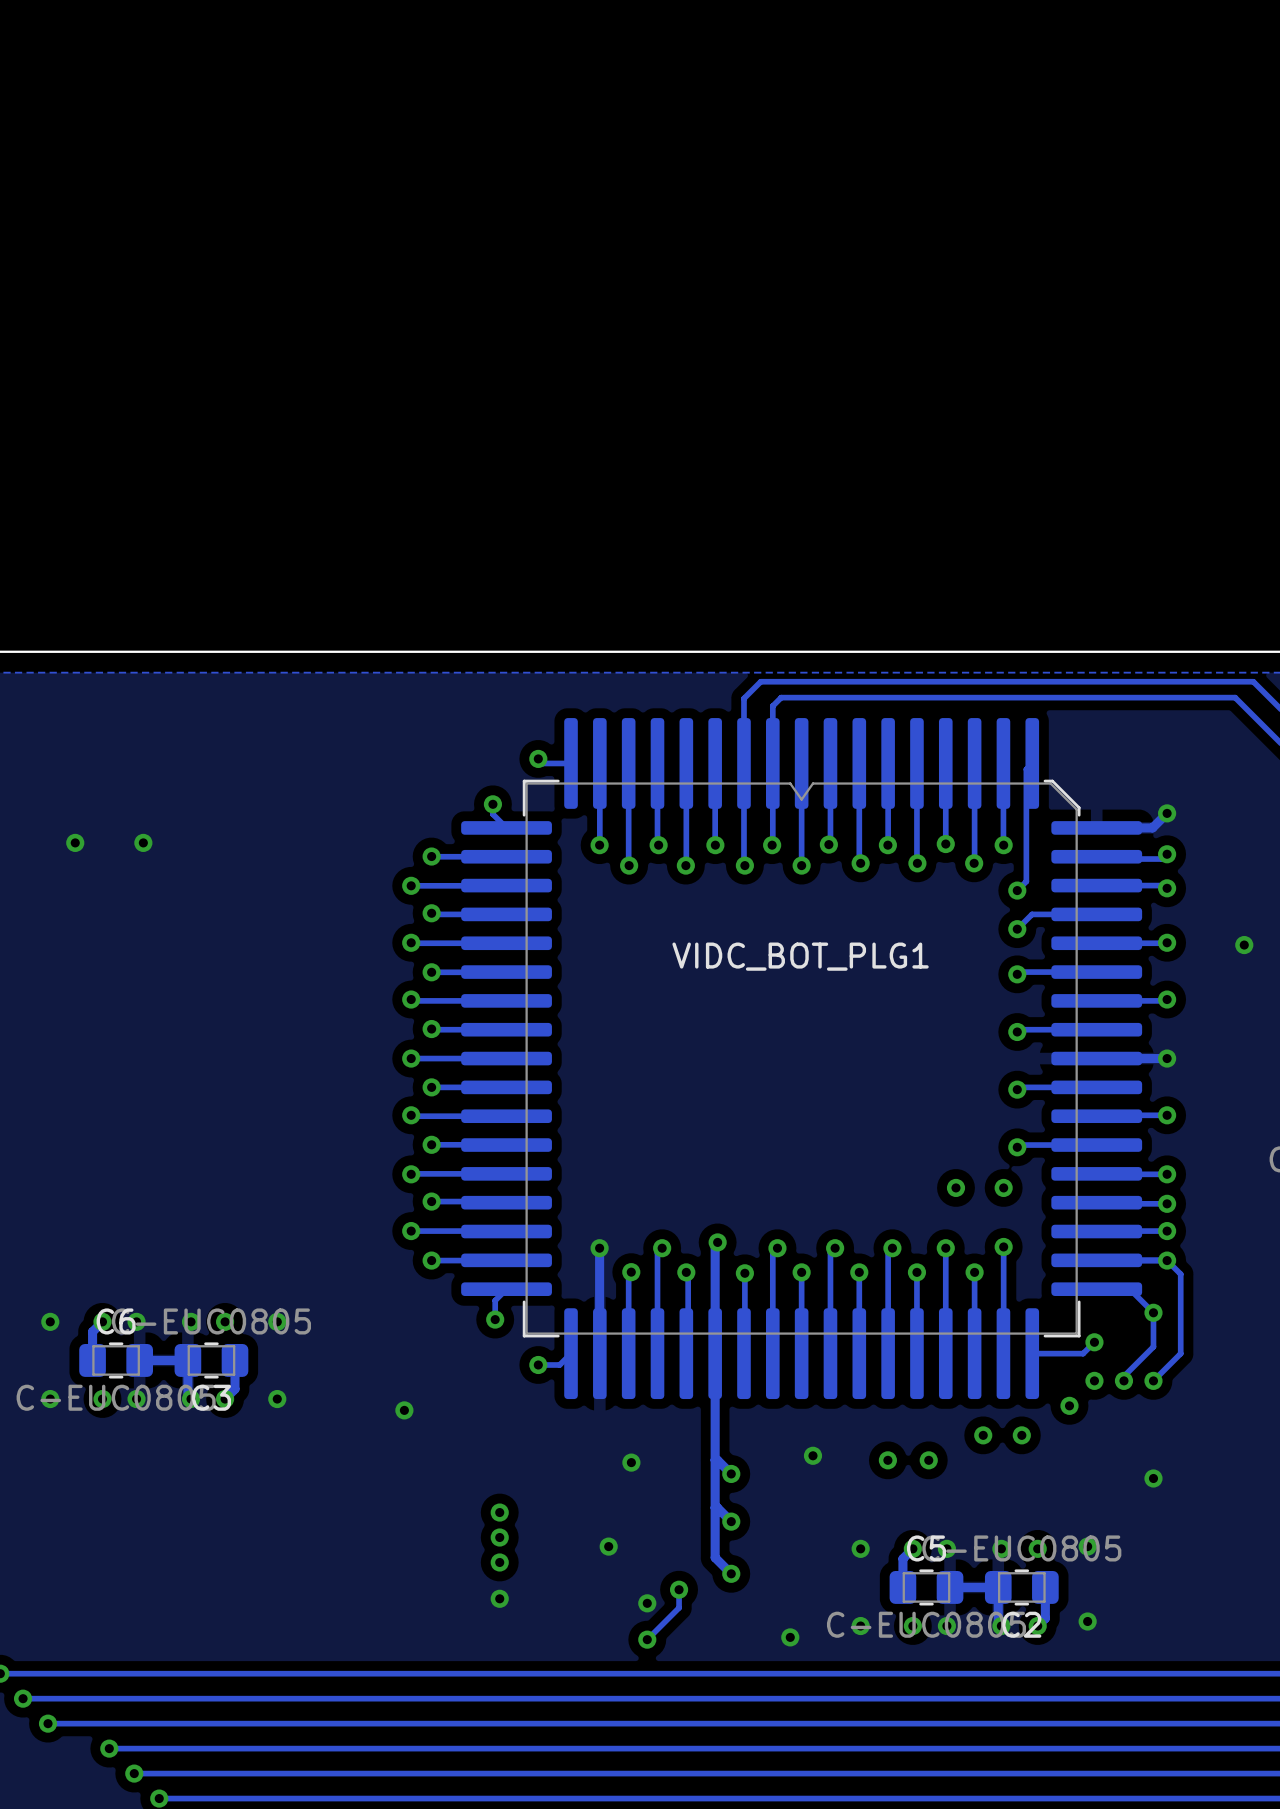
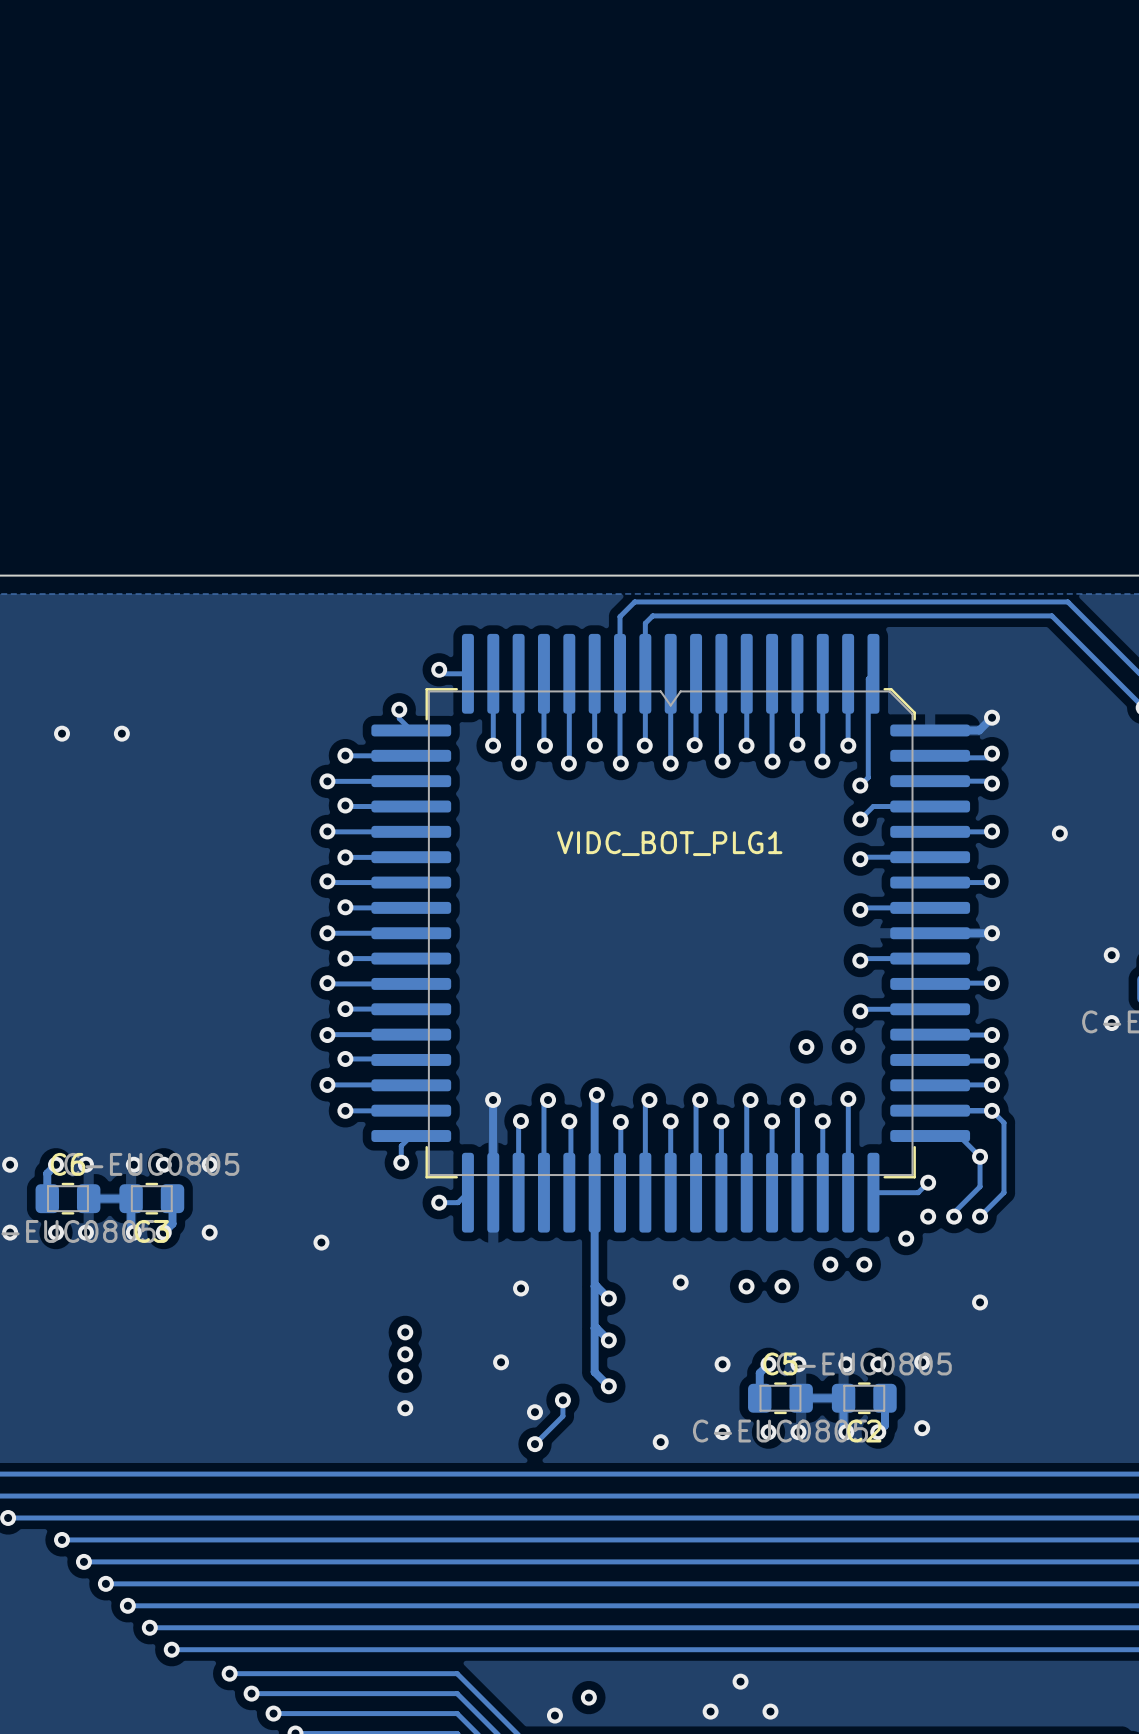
via: none -> (62, 733)
via: none -> (121, 733)
via: (75, 842) -> none
via: (143, 842) -> none

